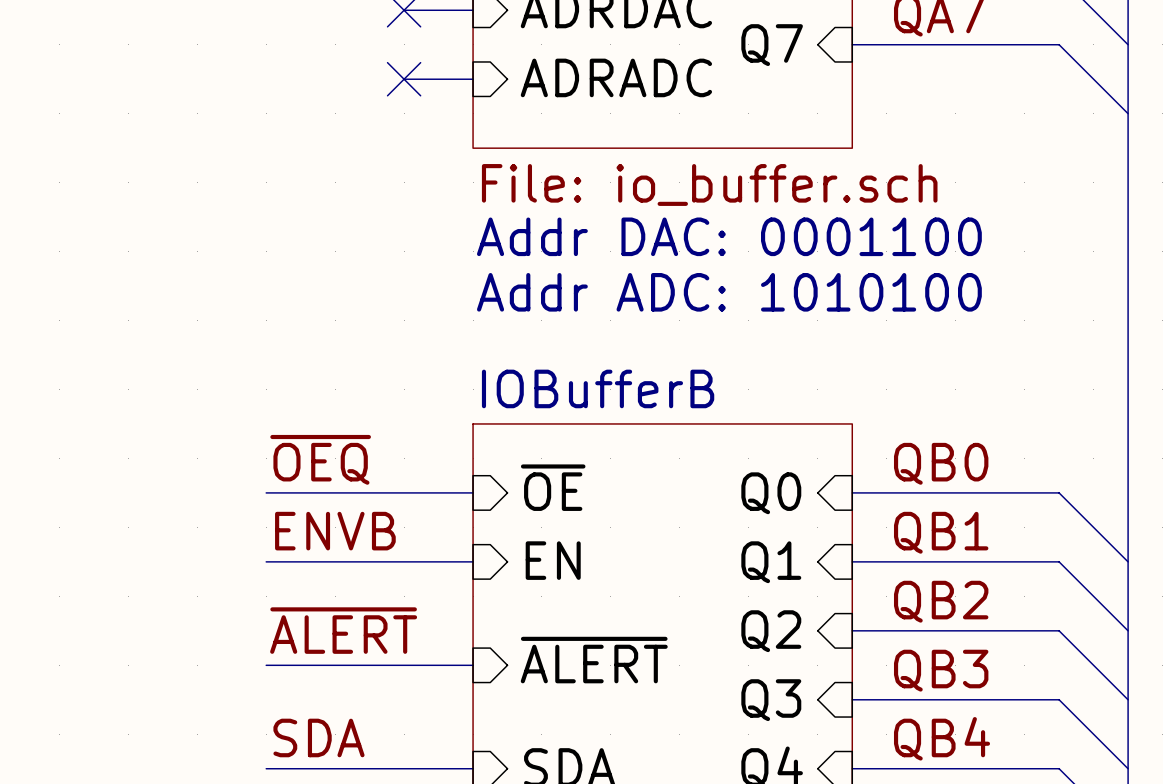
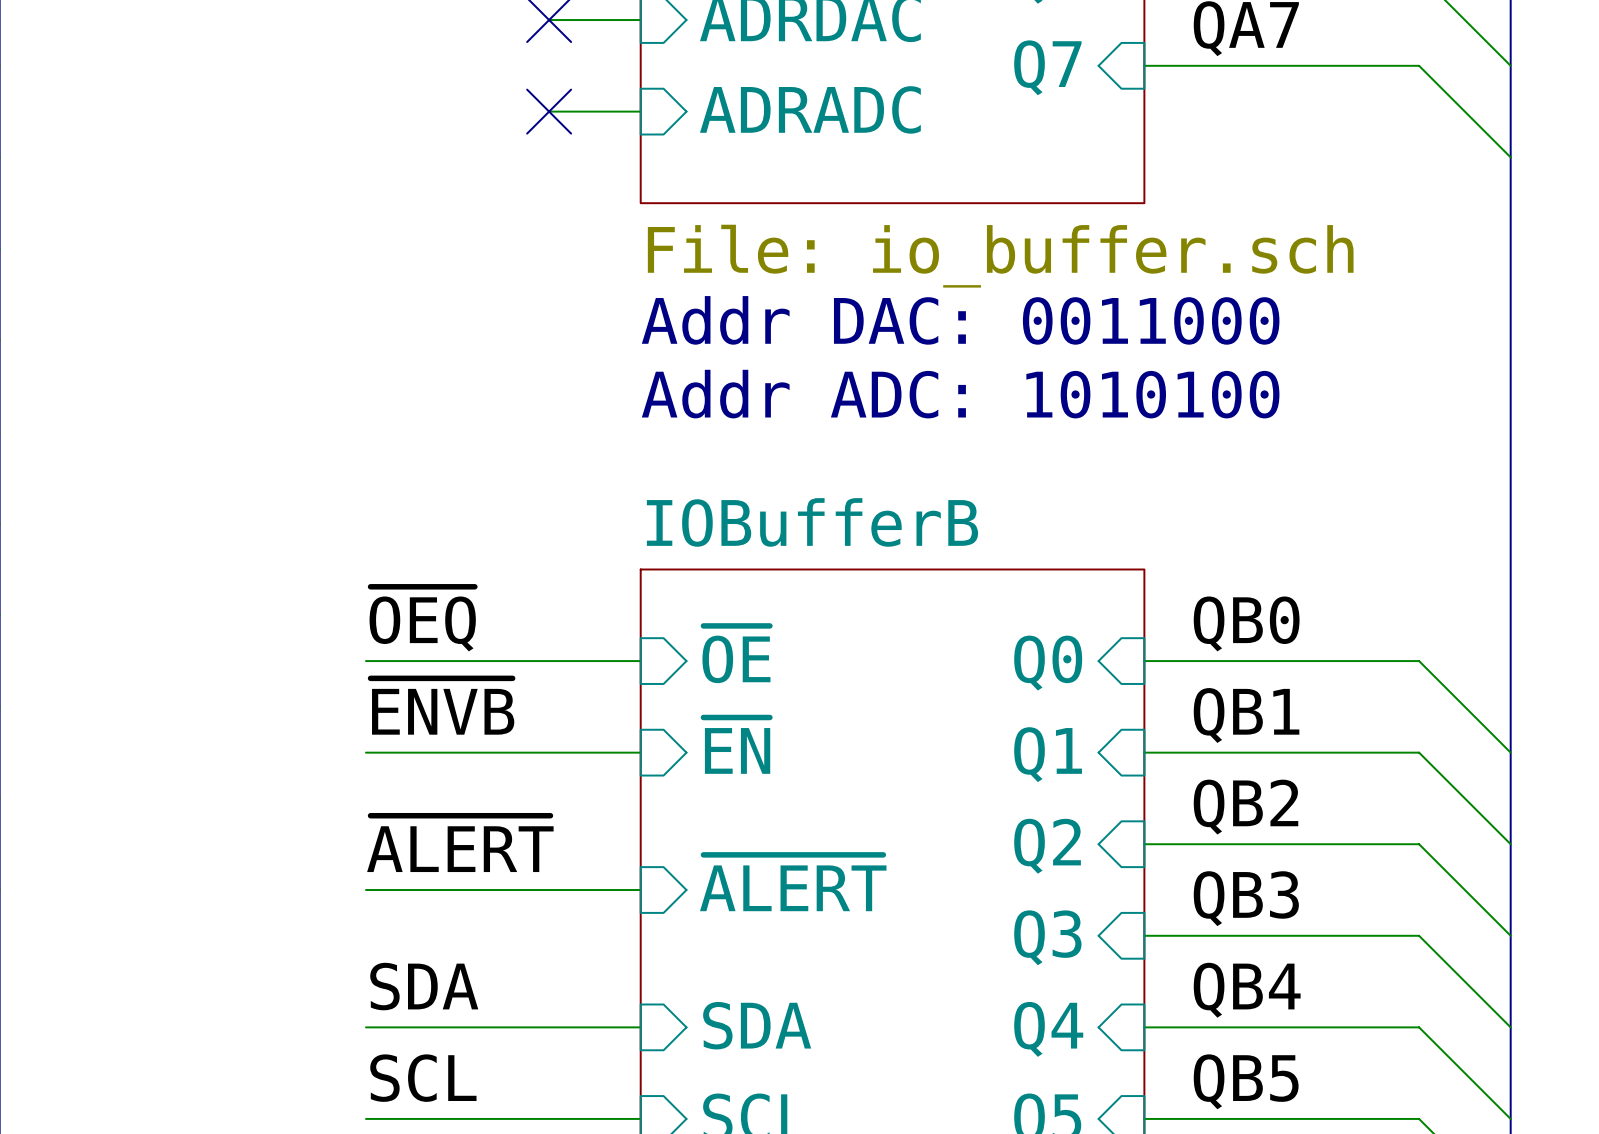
text: Addr DAC: 0001100 (729, 236) -> Addr DAC: 0011000 (960, 320)
label: ENVB (335, 531) -> ~{ENVB} (442, 706)
sheet pin: EN (553, 560) -> ~{EN} (736, 745)

